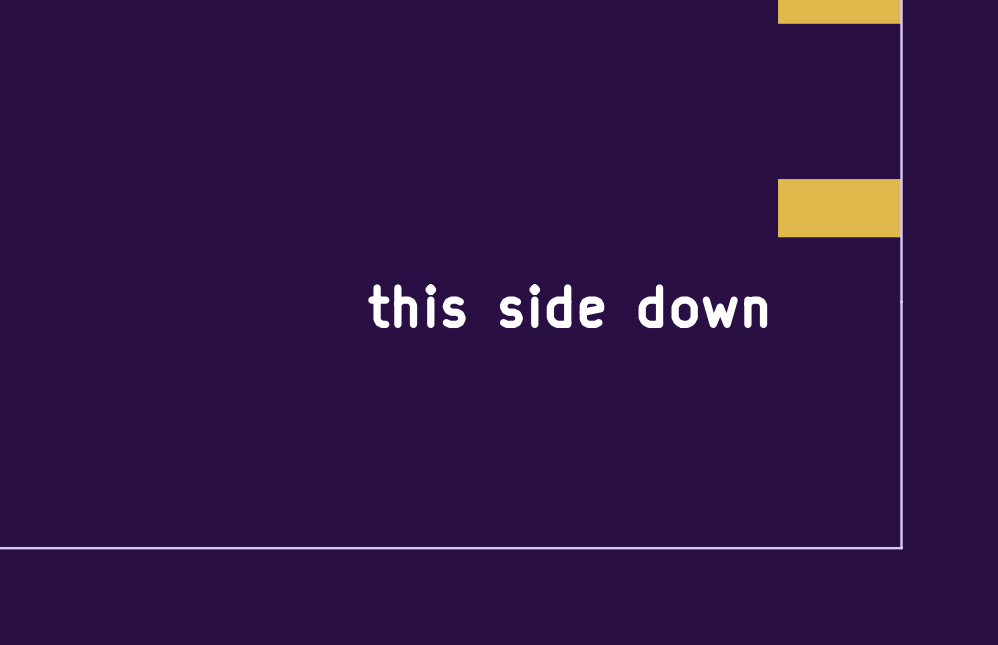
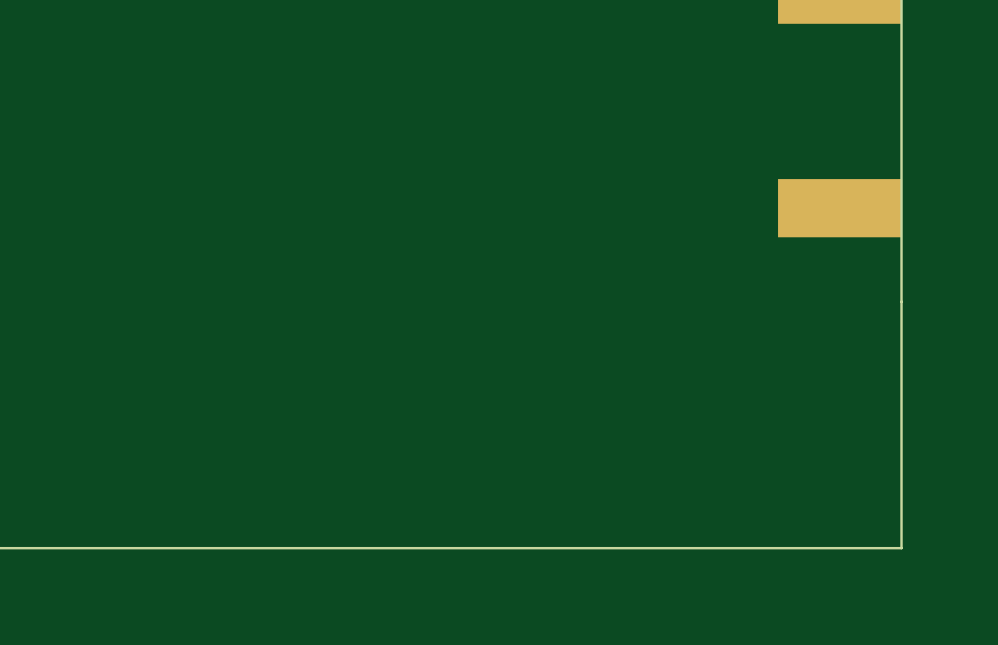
text: this side down (567, 306) -> none

